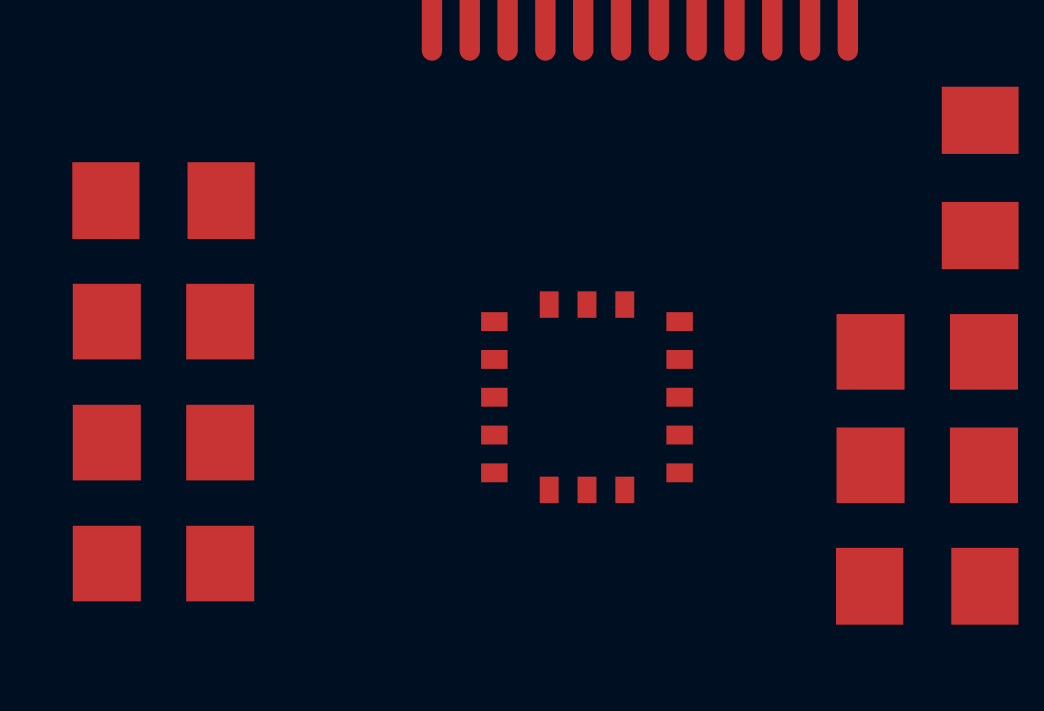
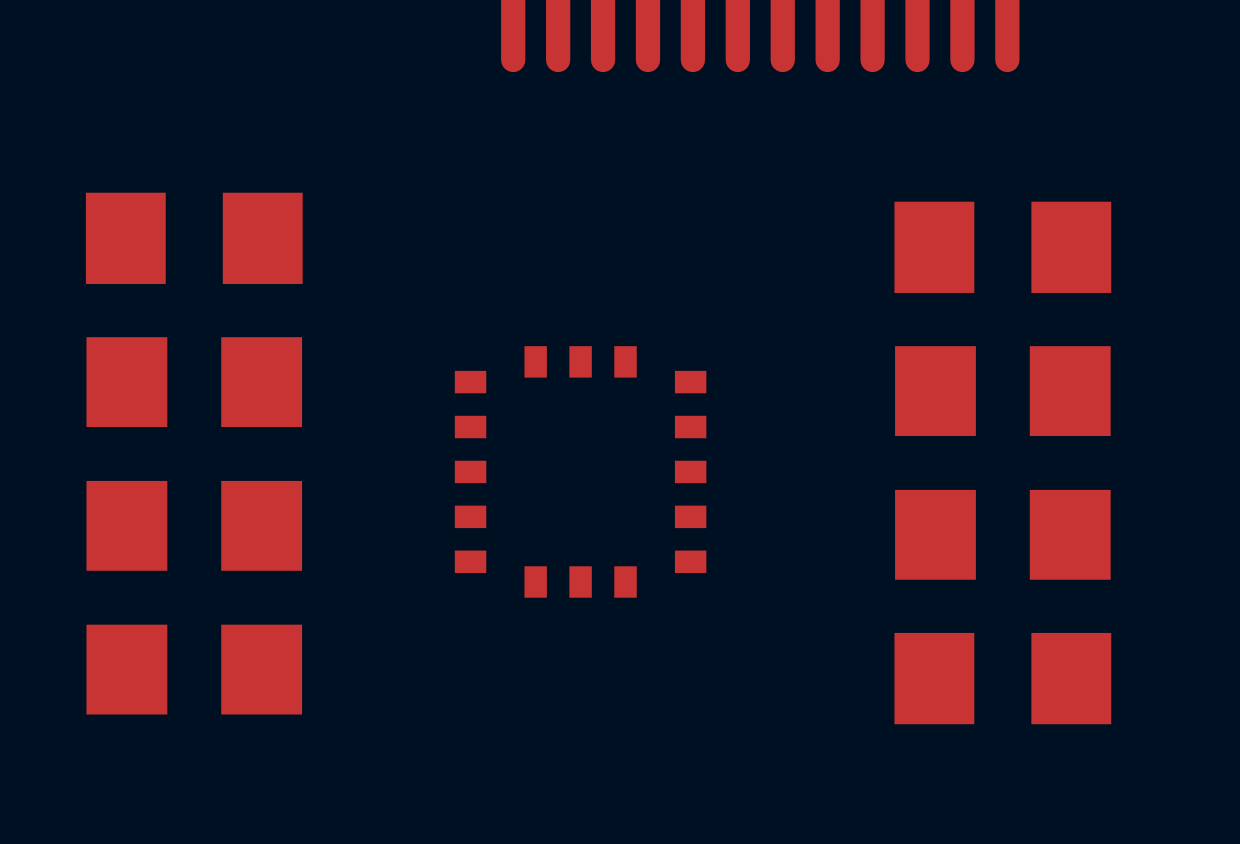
part: (980, 177) -> none
part: none -> (1002, 247)
part: none -> (1002, 391)
part: (927, 351) -> none
part position: (586, 397) -> (580, 471)
part: none -> (1002, 534)
part: (927, 465) -> none
part: none -> (1002, 678)
part: (927, 586) -> none

